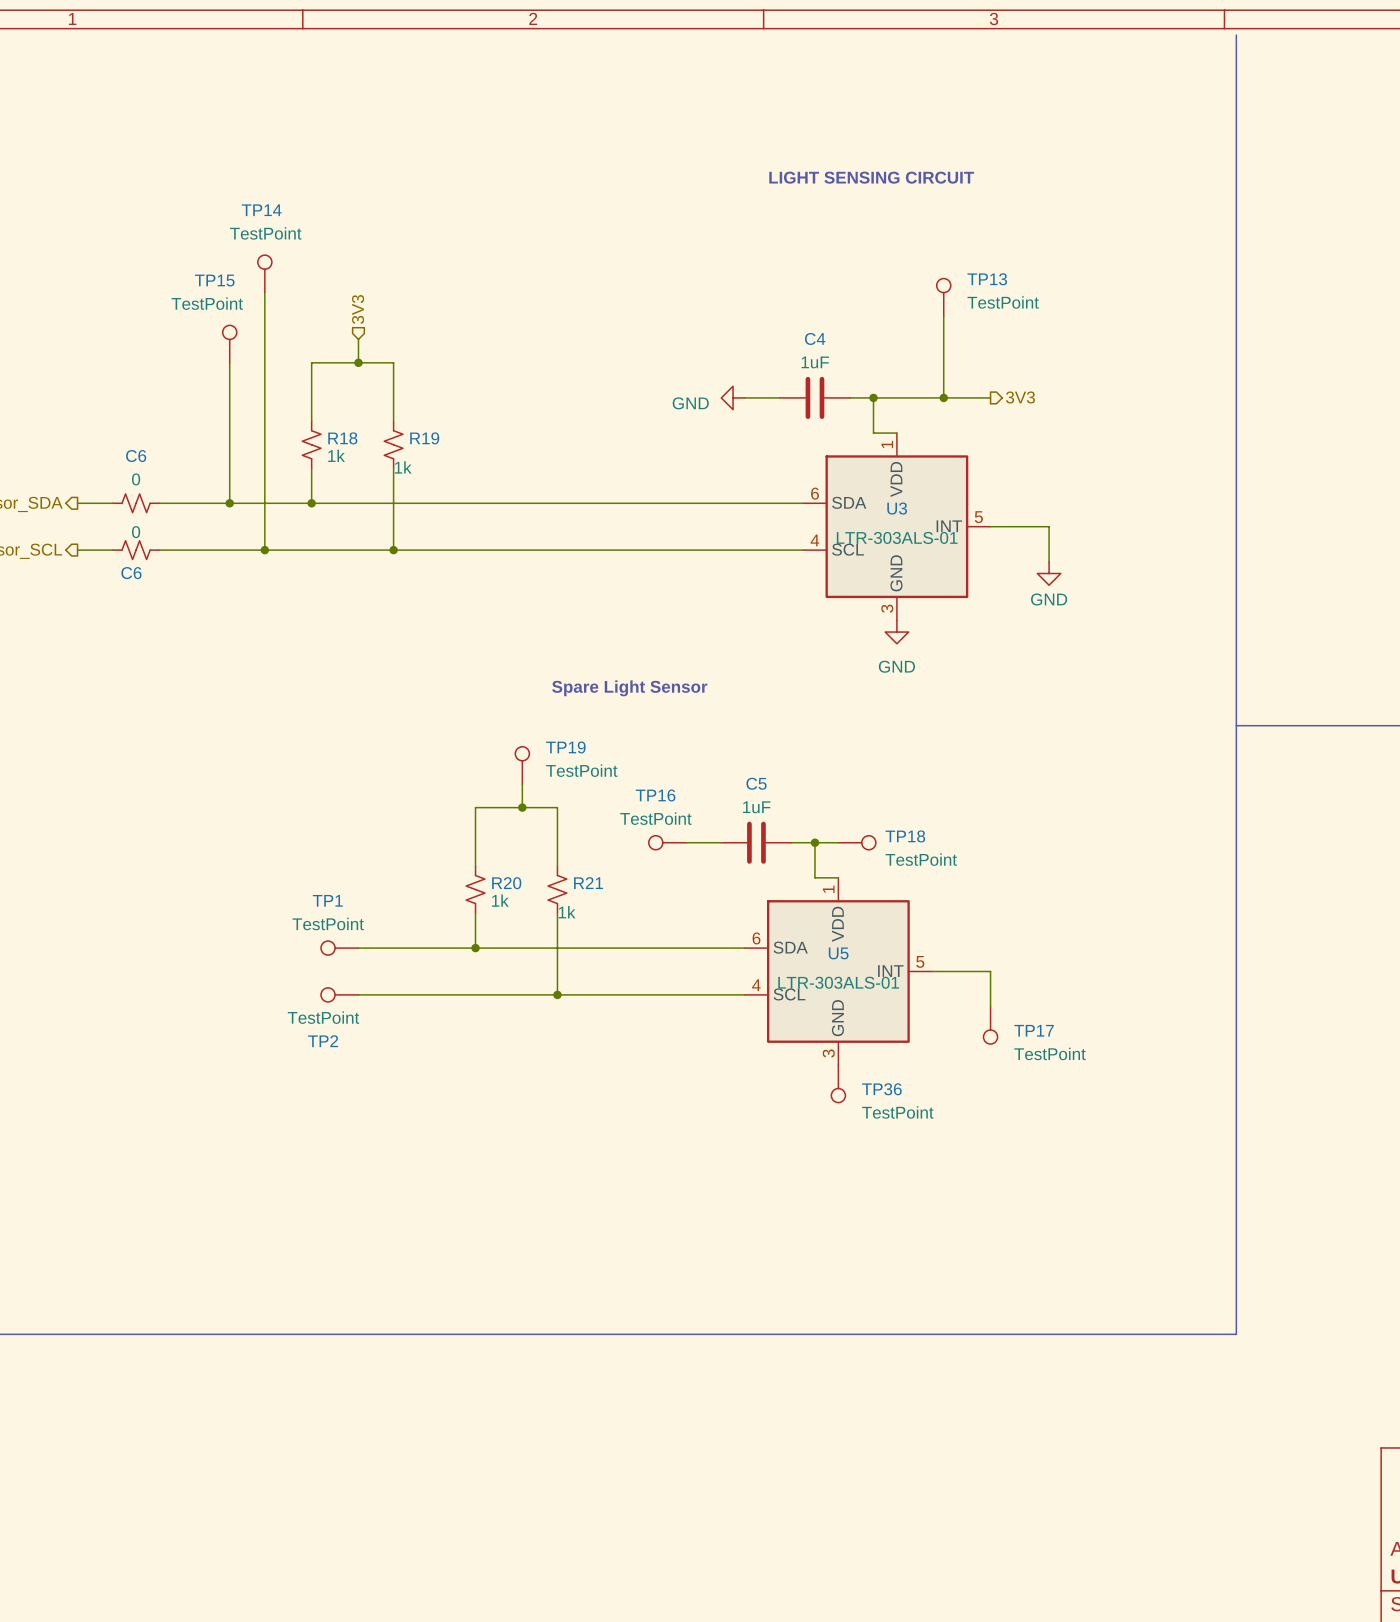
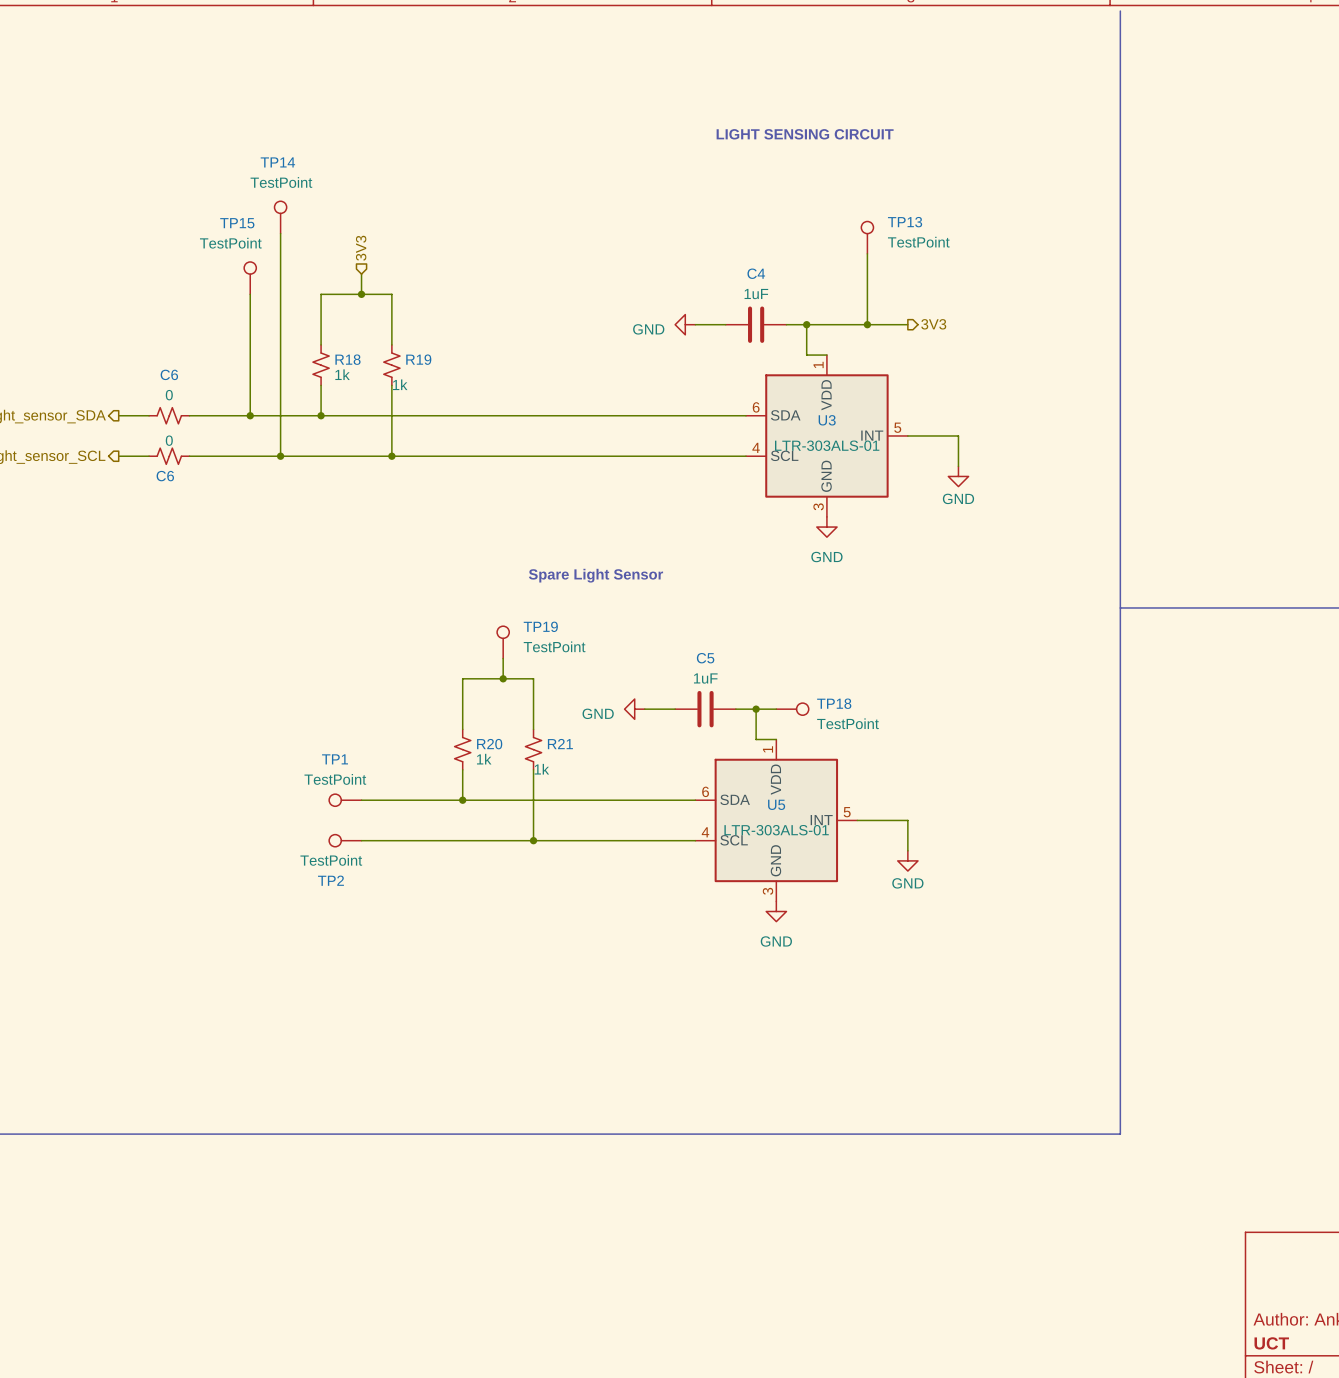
TP16: TestPoint (667, 842) -> none
power symbol: none -> GND (634, 709)
power symbol: none -> GND (907, 860)
TP17: TestPoint (990, 1025) -> none
power symbol: none -> GND (776, 911)
TP36: TestPoint (838, 1083) -> none

